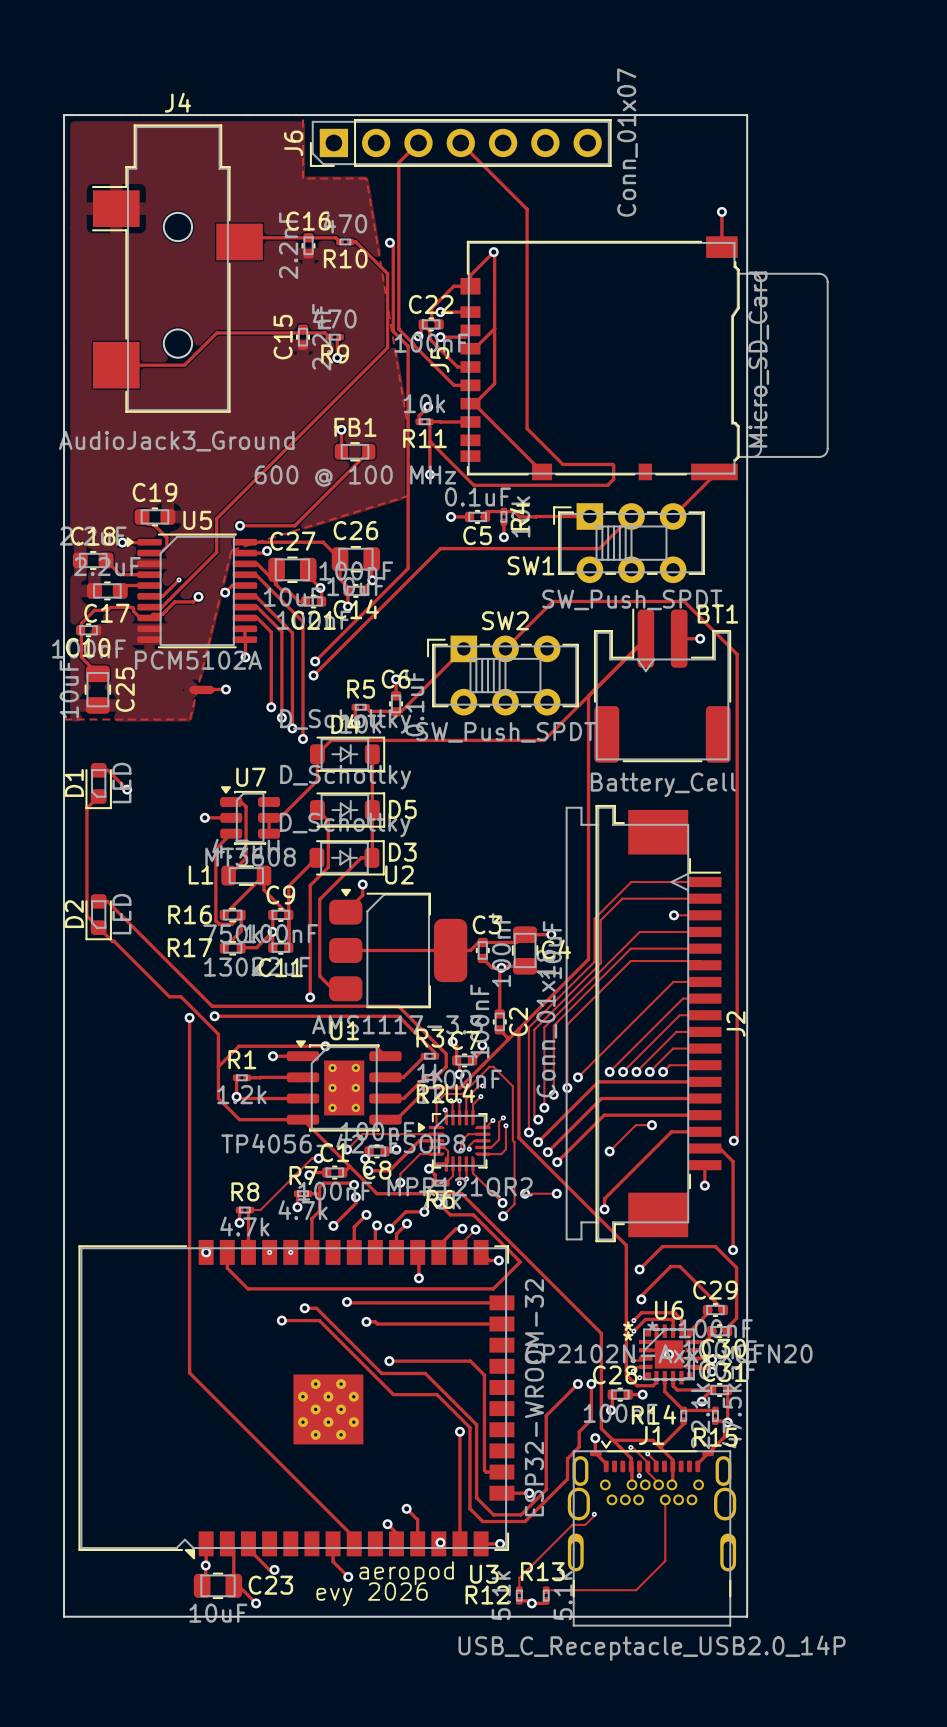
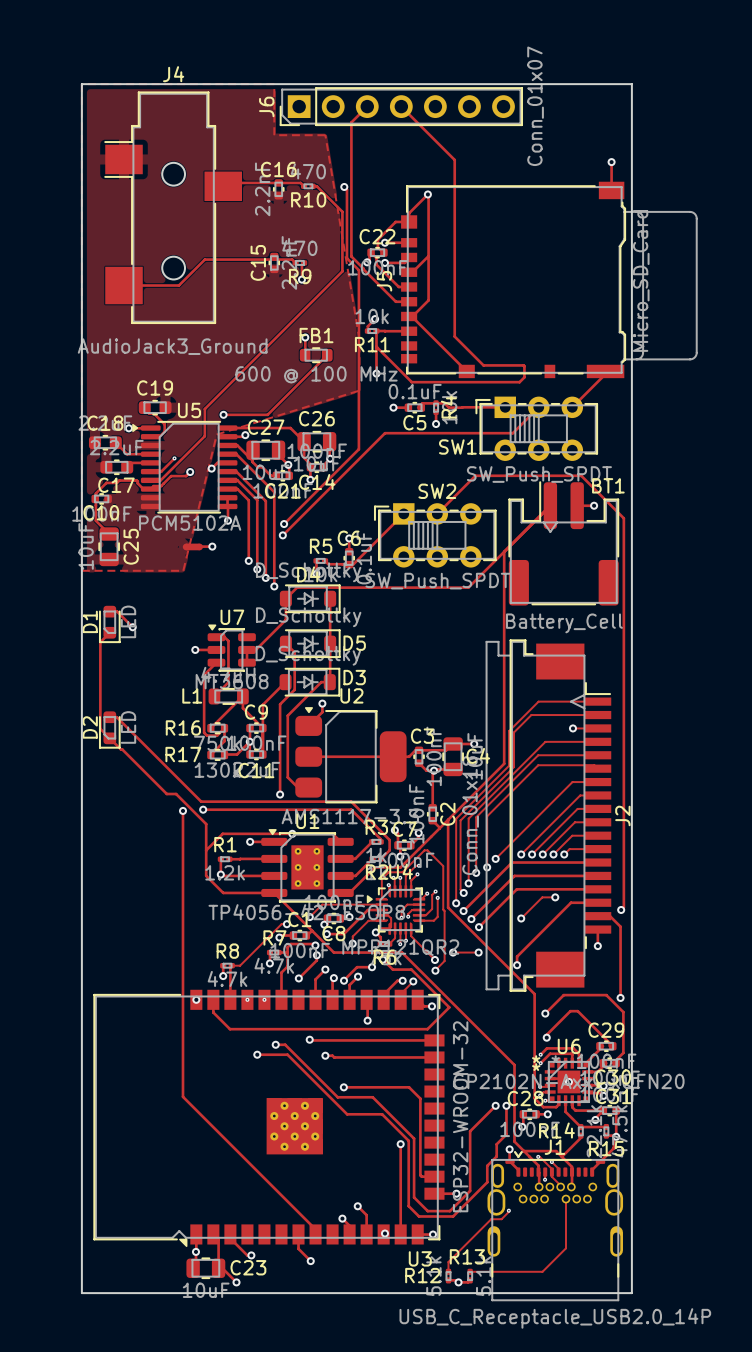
text: aeropod (406, 1573) -> none
text: evy 2026 (372, 1594) -> none

